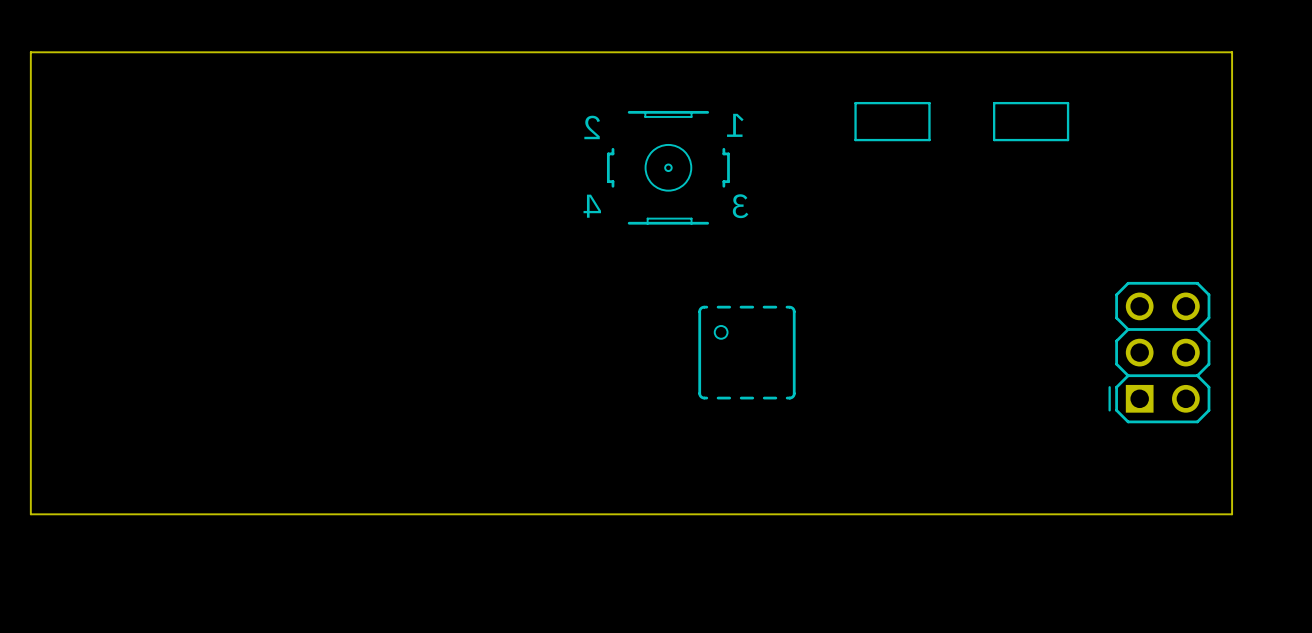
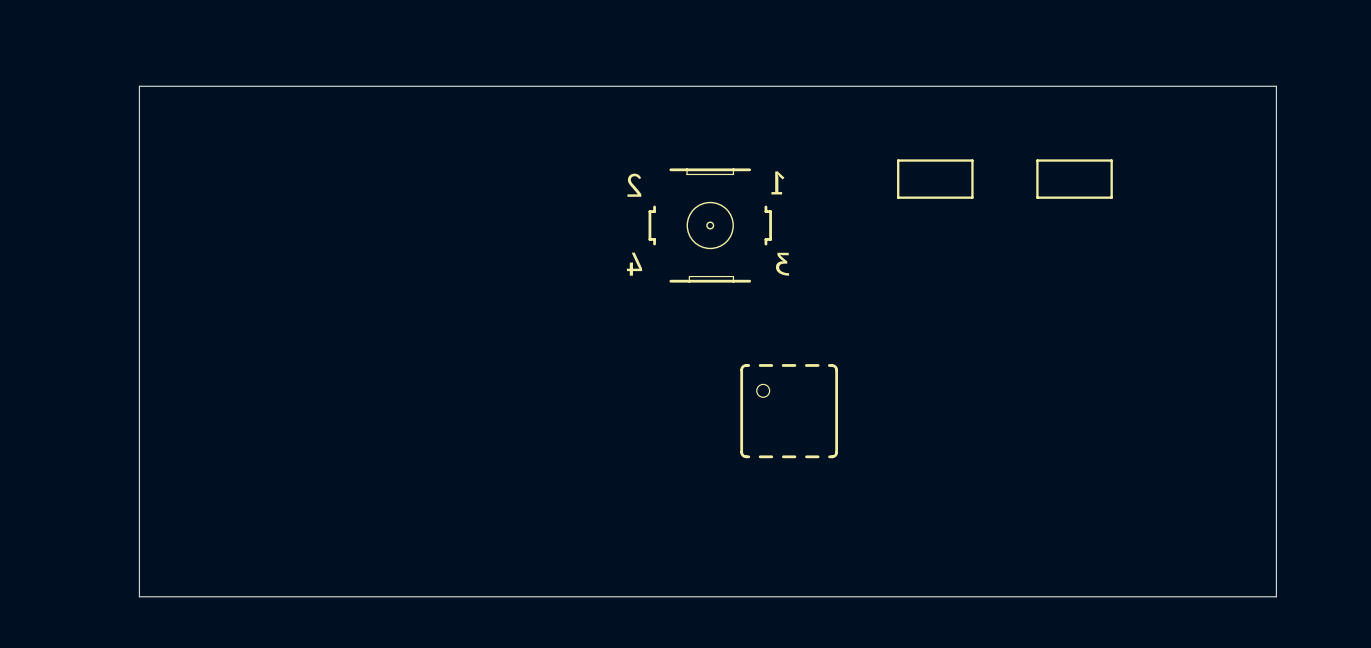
board edge: (1232, 52) (30, 52) (30, 514) (1232, 514) -> (1276, 109) (1276, 86) (139, 86) (139, 596) (1276, 596) (1276, 573)
part: (1159, 352) -> none

